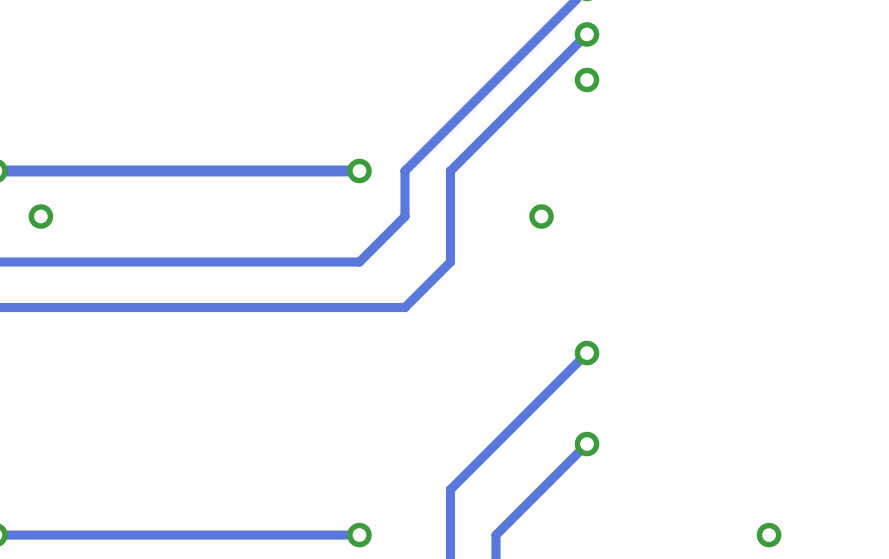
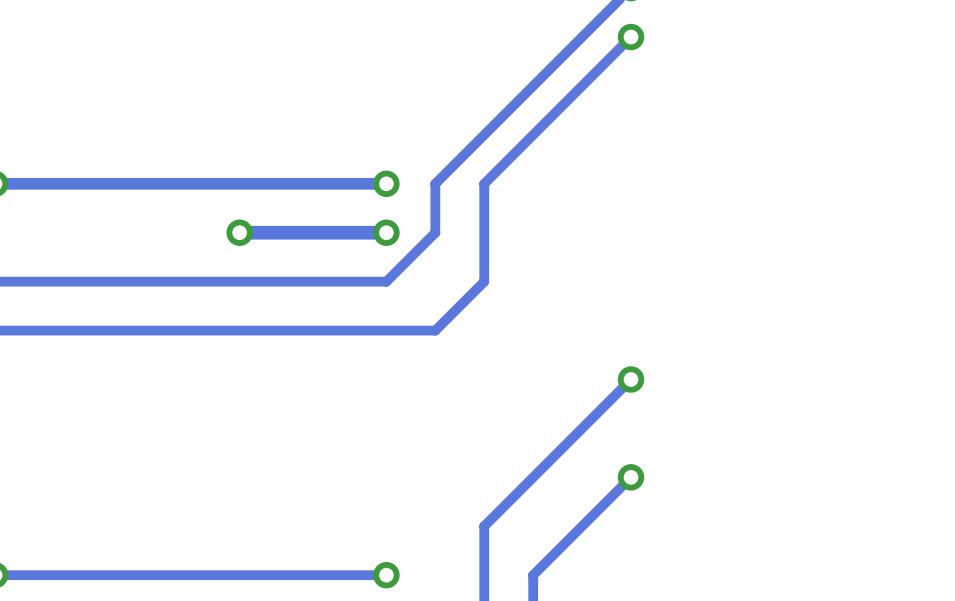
via: (587, 79) -> none
via: (40, 216) -> none
via: none -> (239, 232)
track: none -> (386, 232) (239, 232)
via: none -> (386, 232)
via: (541, 216) -> none
via: (769, 535) -> none

